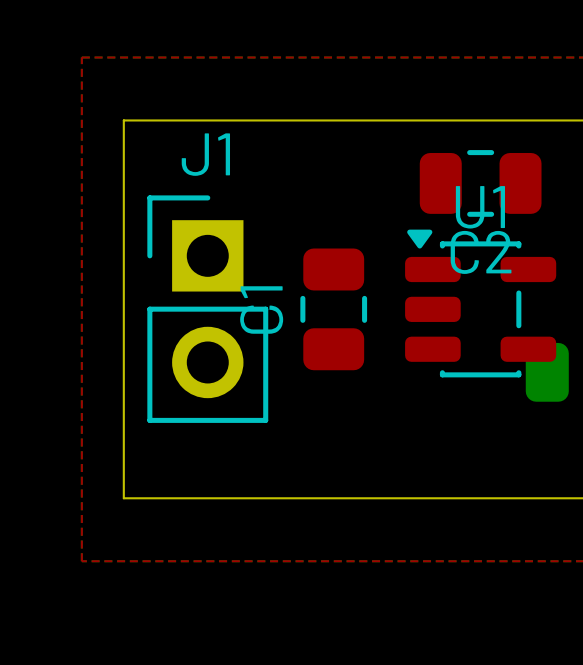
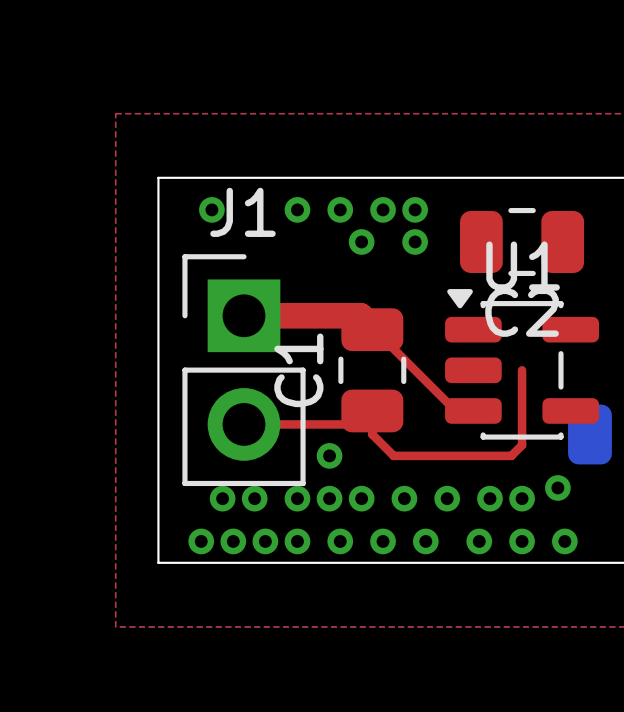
via: none -> (211, 209)
via: none -> (297, 209)
via: none -> (340, 209)
via: none -> (383, 209)
via: none -> (415, 209)
via: none -> (361, 241)
via: none -> (415, 241)
top track: none -> (244, 315) (360, 315) (455, 410) (473, 410)
top track: none -> (522, 370) (522, 445) (511, 455) (393, 455) (372, 434) (372, 398)
top track: none -> (372, 408) (356, 424) (244, 424)
via: none -> (329, 455)
via: none -> (557, 487)
via: none -> (222, 498)
via: none -> (254, 498)
via: none -> (297, 498)
via: none -> (329, 498)
via: none -> (361, 498)
via: none -> (404, 498)
via: none -> (447, 498)
via: none -> (489, 498)
via: none -> (522, 498)
via: none -> (201, 541)
via: none -> (233, 541)
via: none -> (265, 541)
via: none -> (297, 541)
via: none -> (340, 541)
via: none -> (383, 541)
via: none -> (425, 541)
via: none -> (479, 541)
via: none -> (522, 541)
via: none -> (564, 541)

